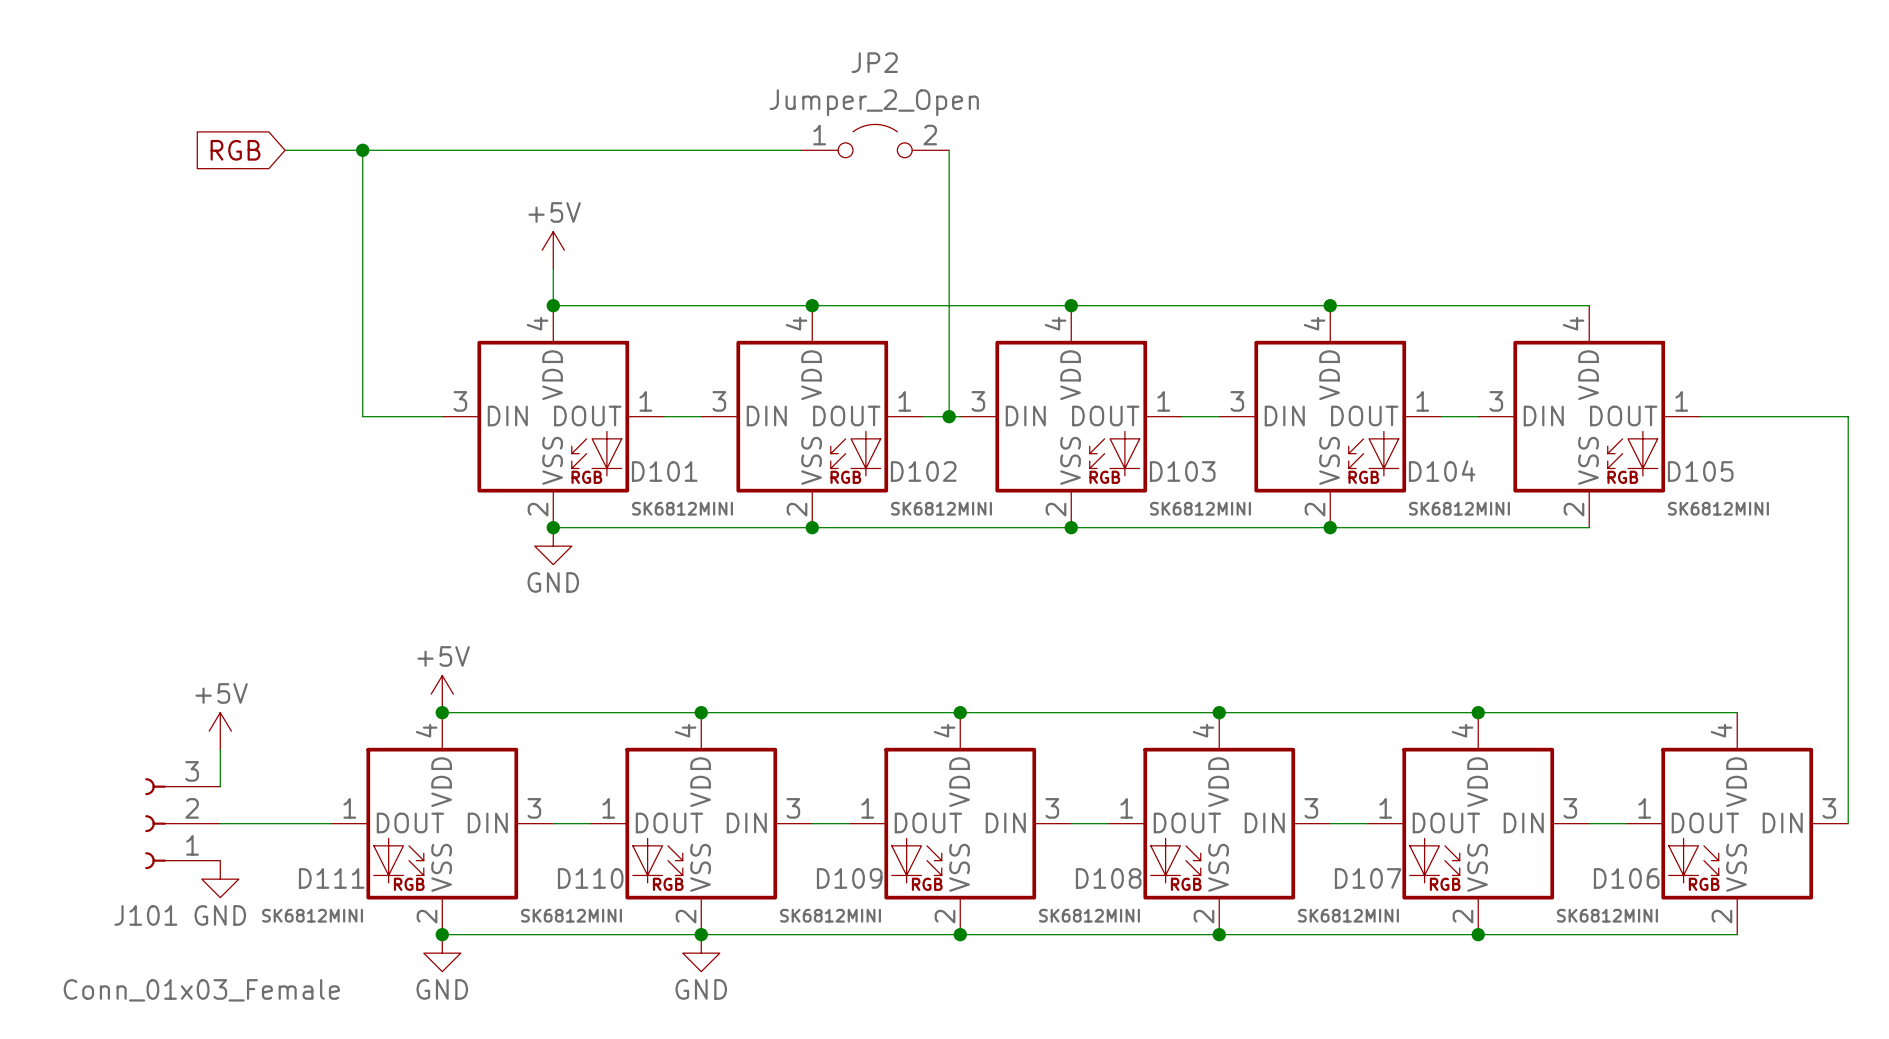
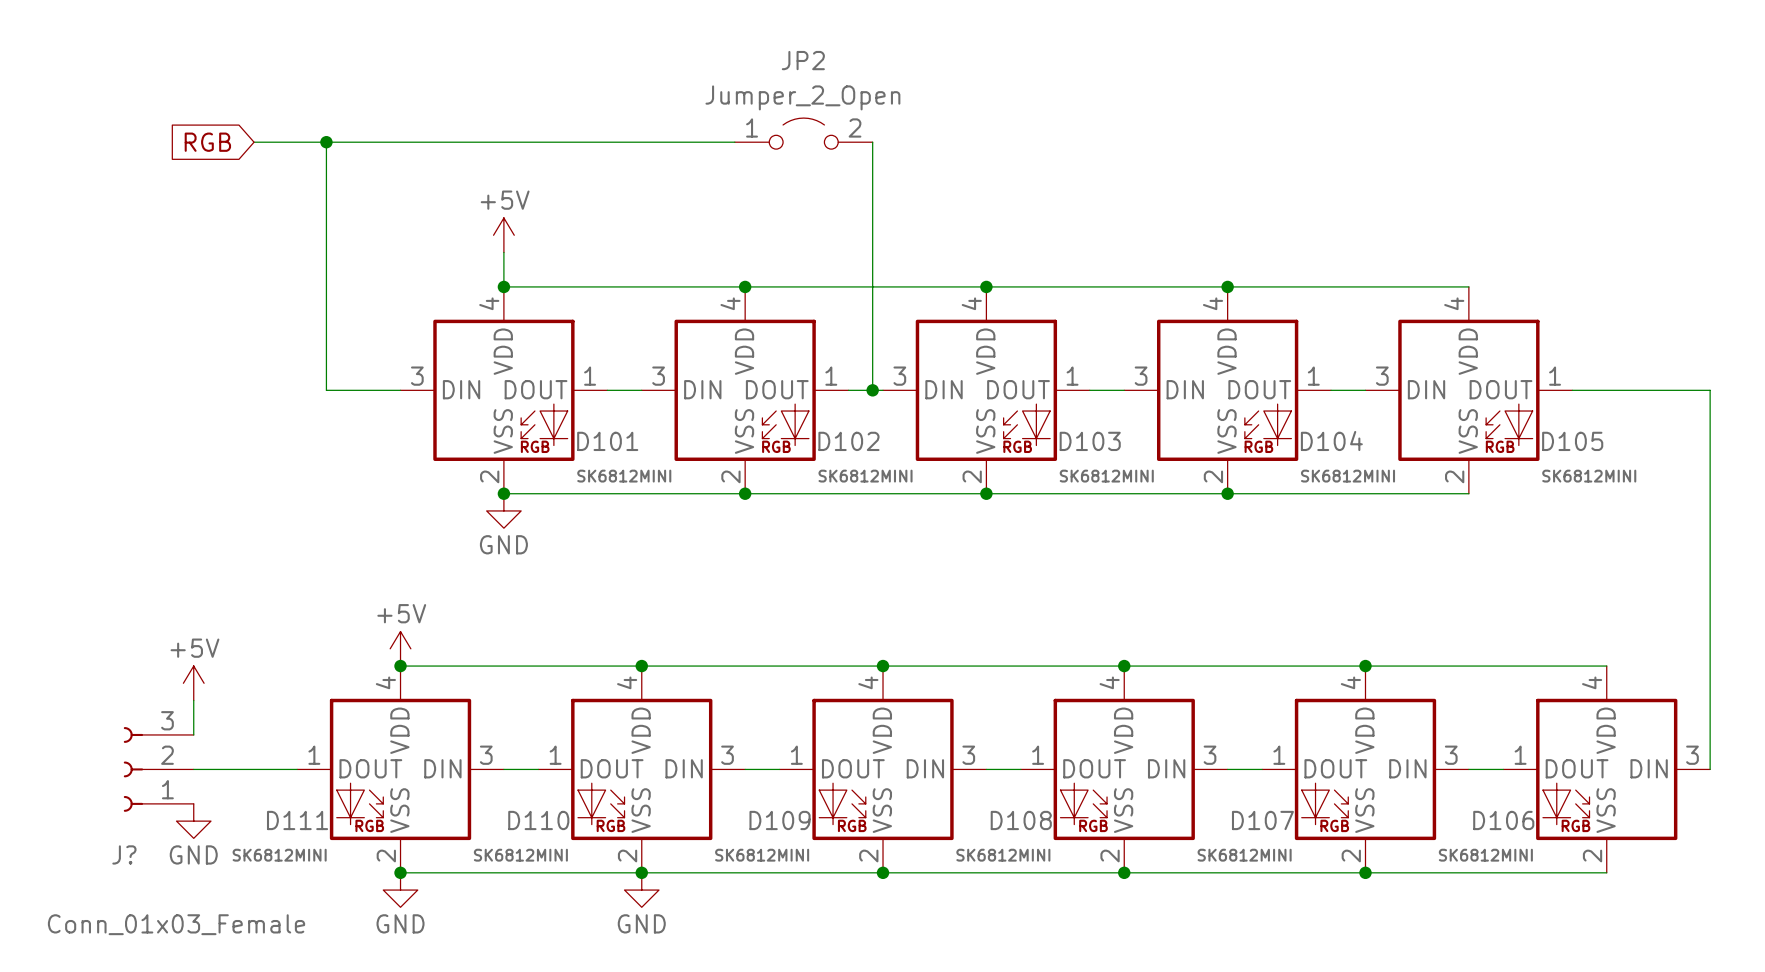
J101 name: J101 (145, 915) -> J? (124, 854)

